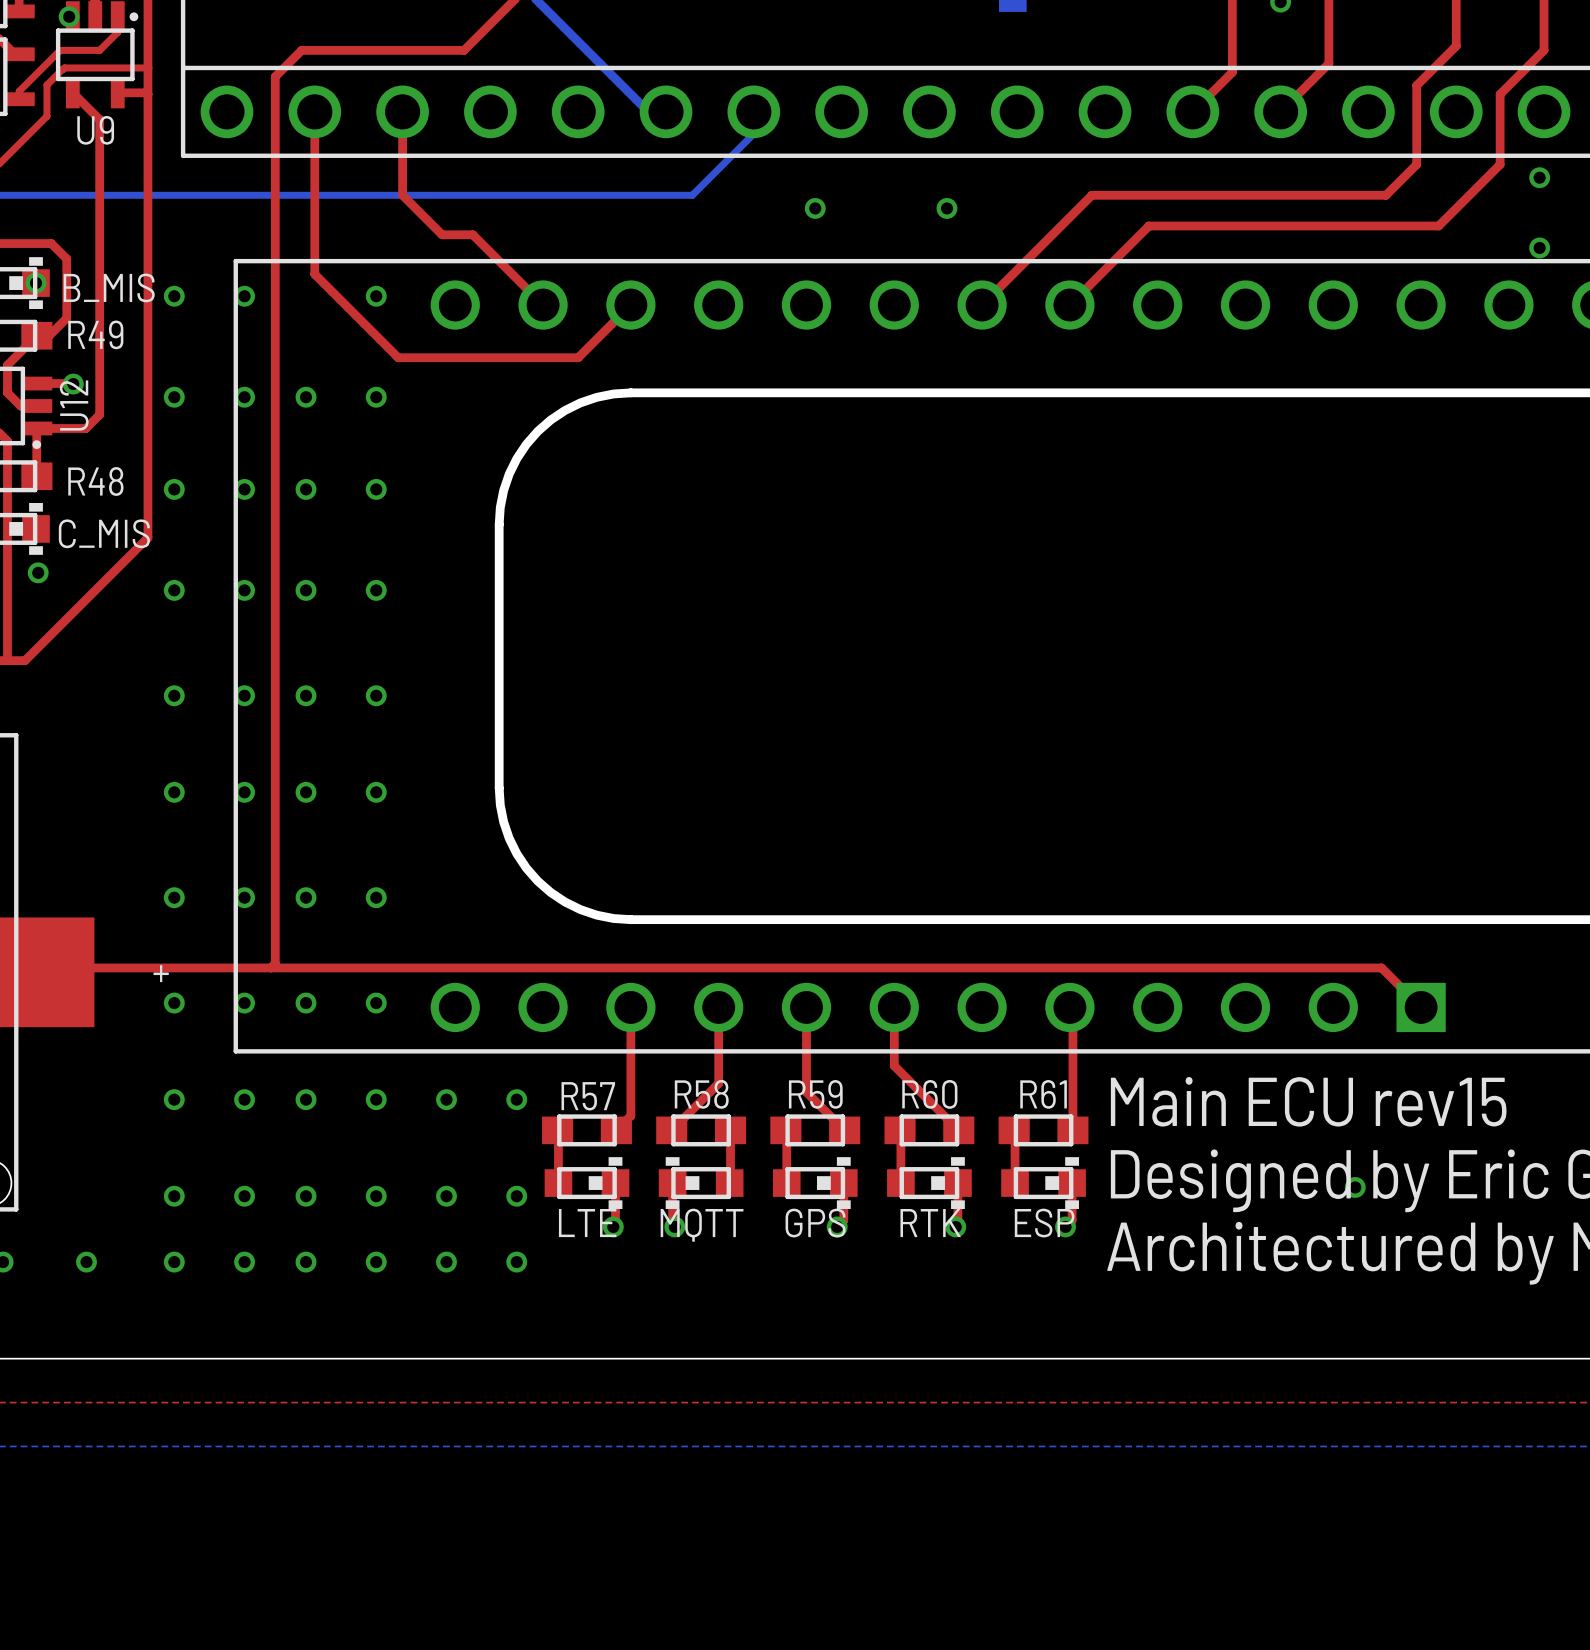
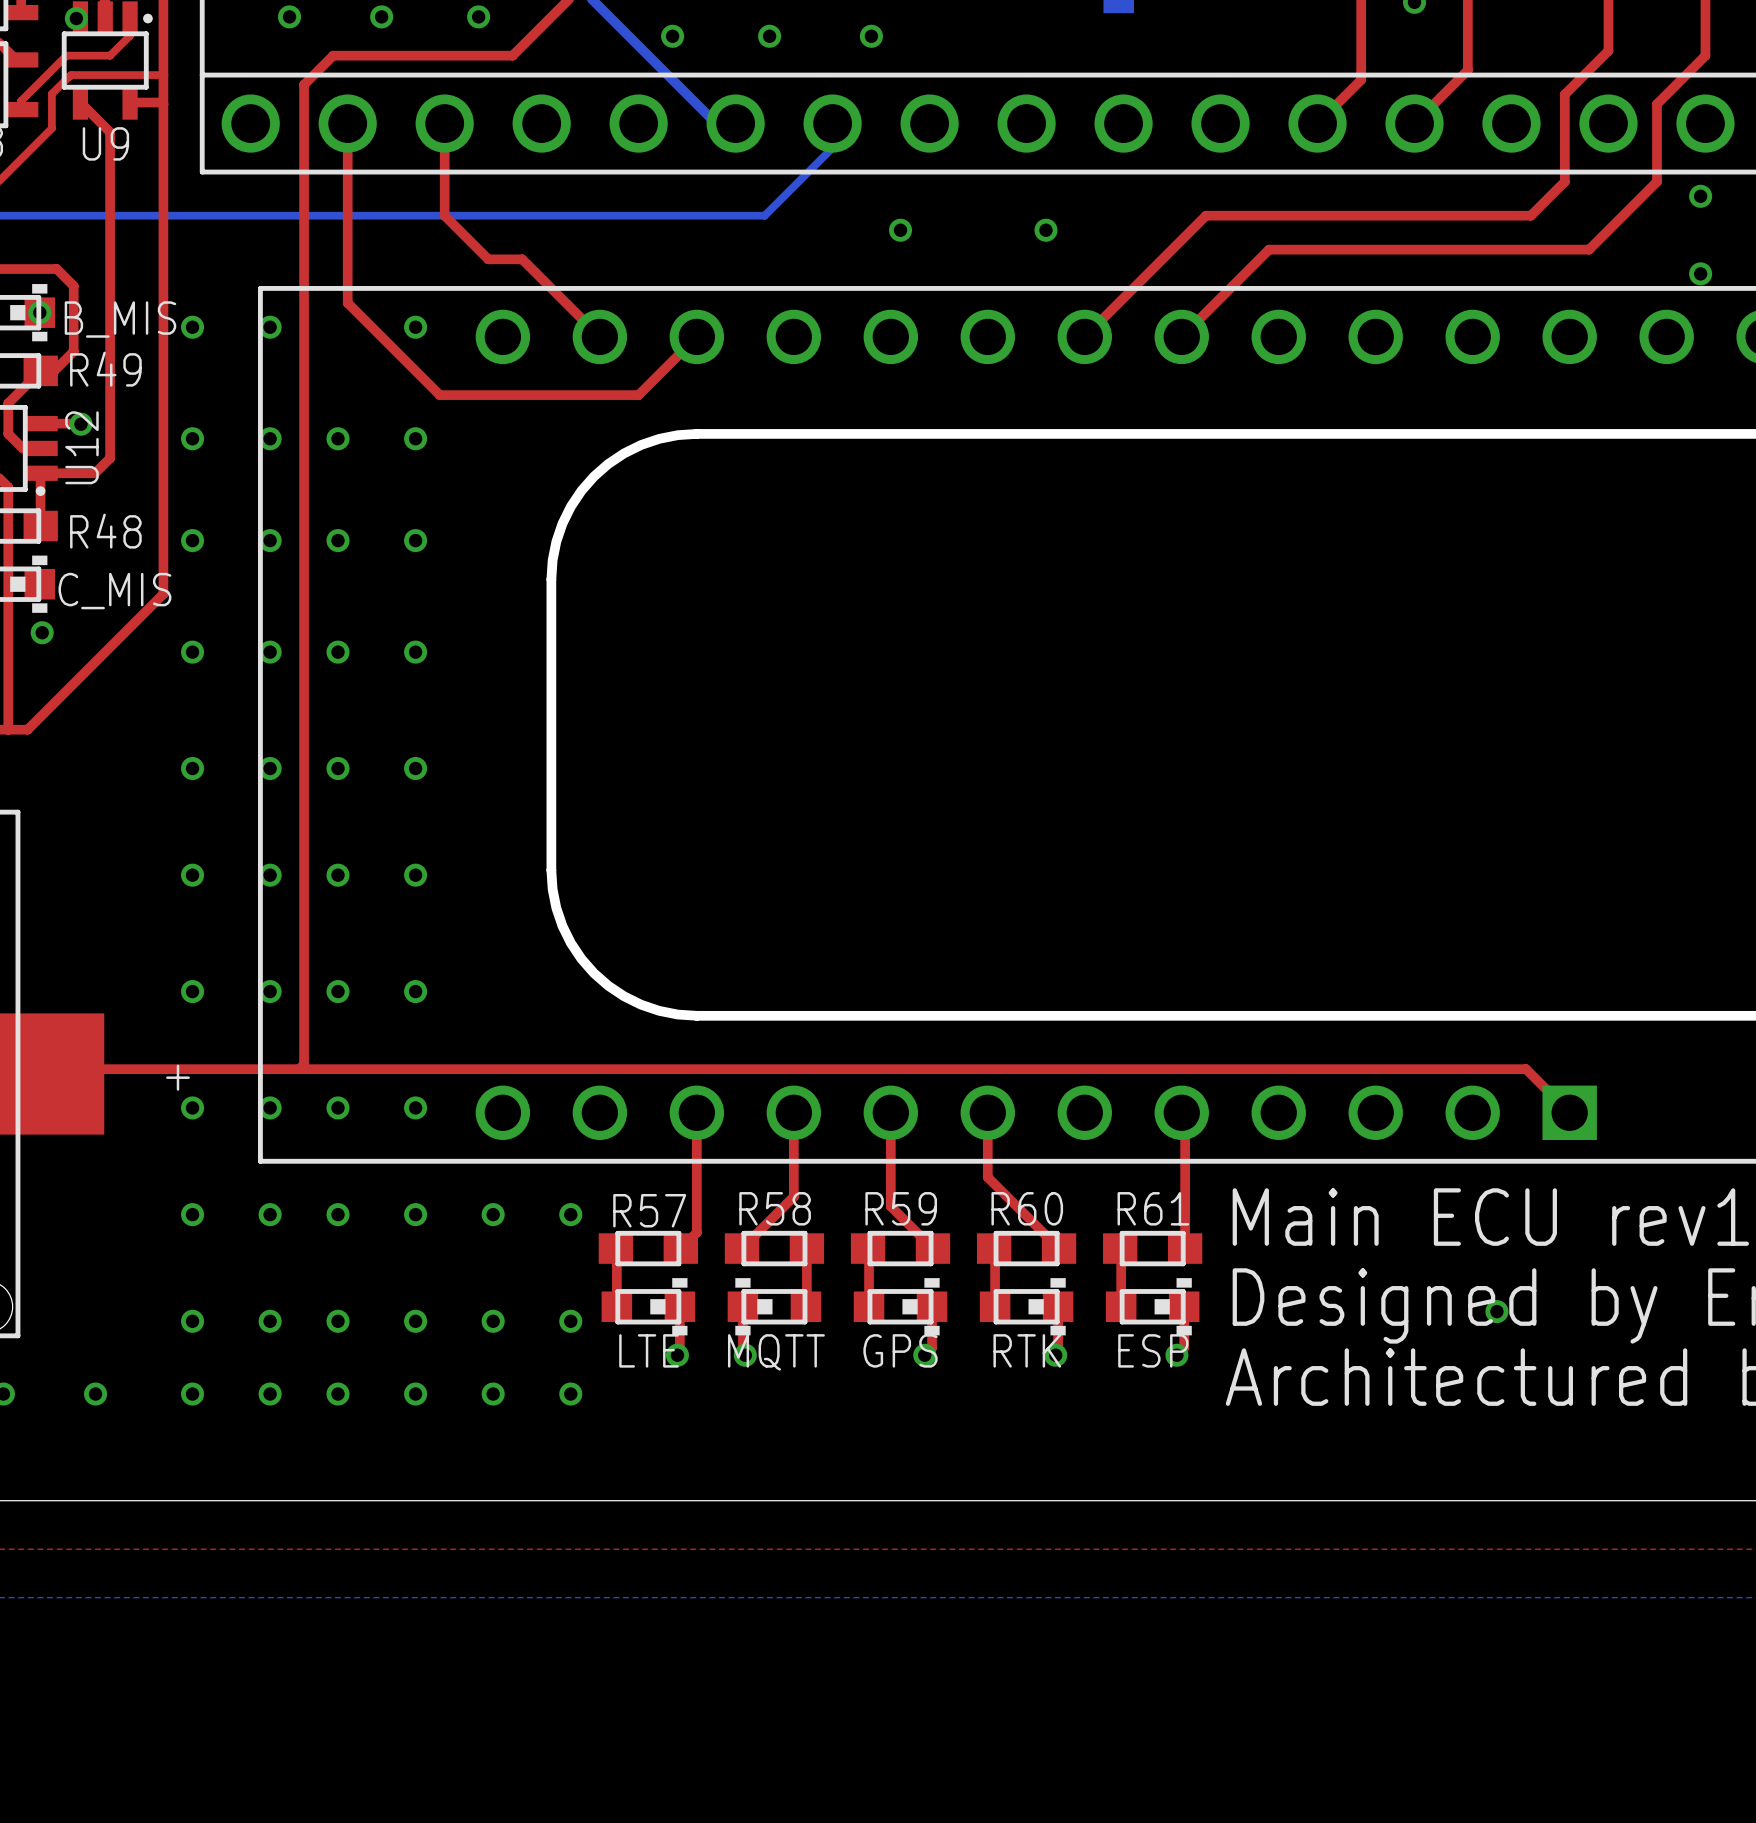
via: none -> (289, 16)
via: none -> (381, 16)
via: none -> (478, 16)
via: none -> (672, 36)
via: none -> (769, 36)
via: none -> (871, 36)

